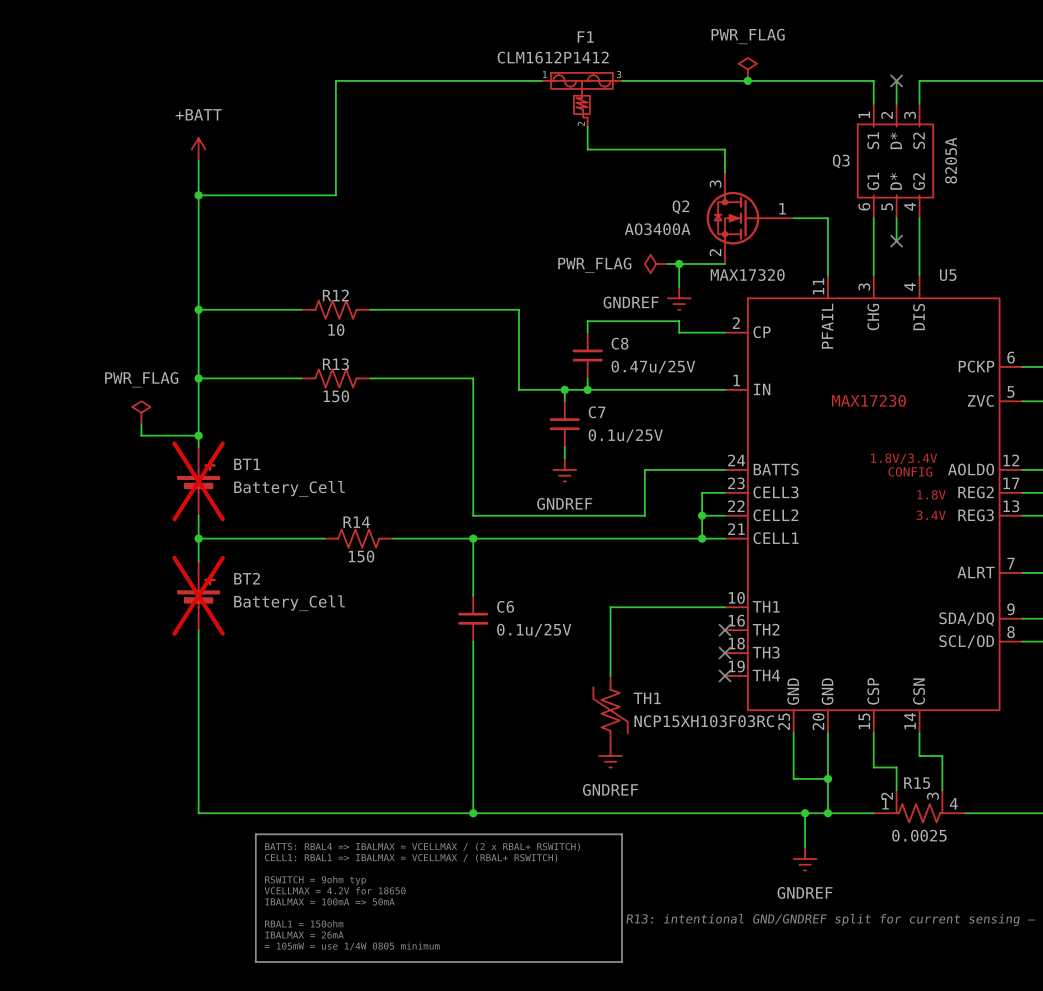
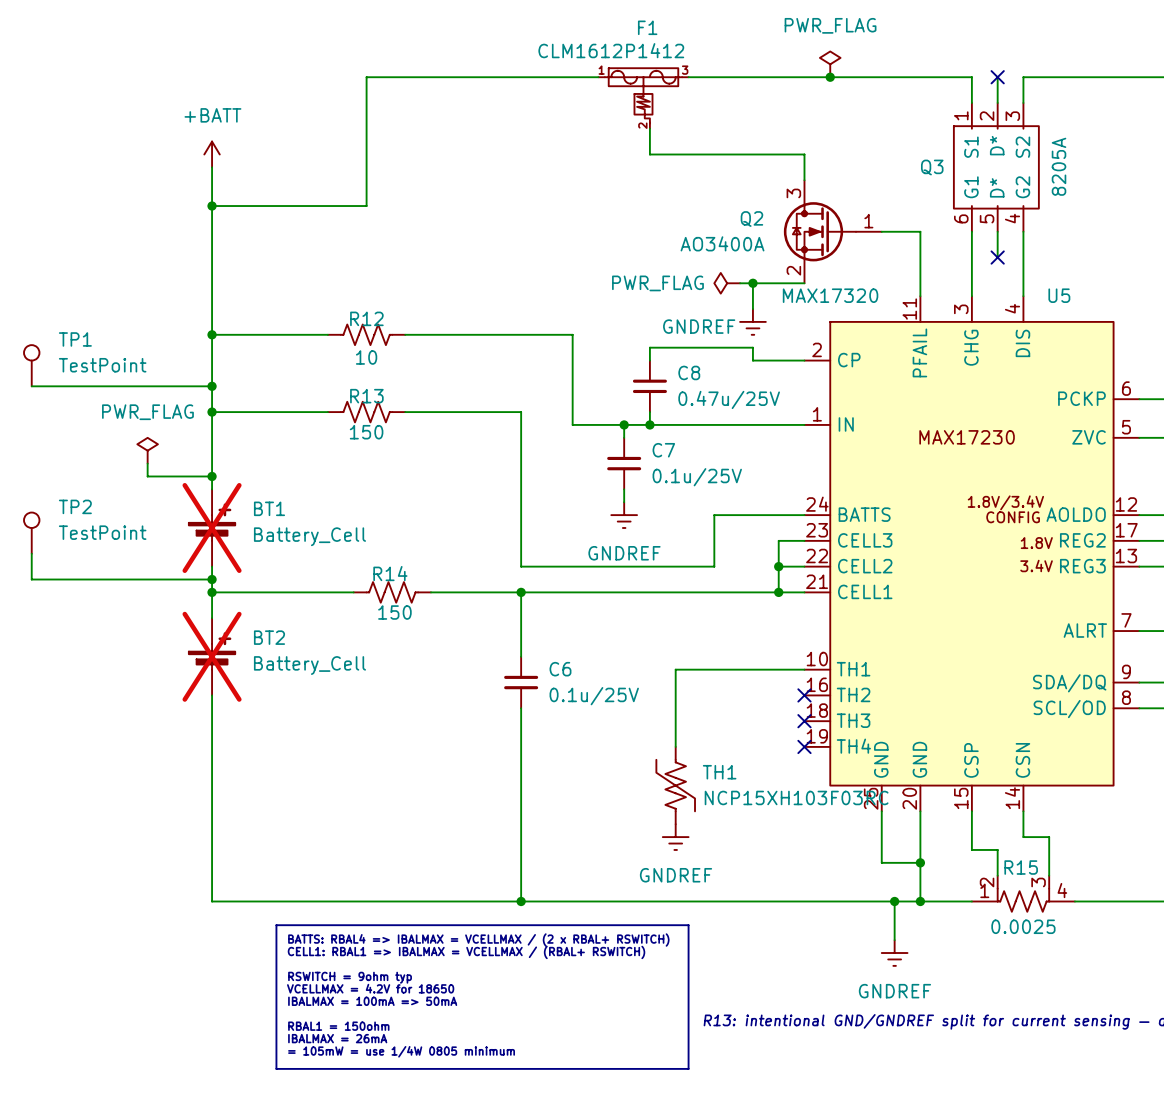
TP1: none -> TestPoint (31, 365)
wire: none -> (31, 386) (212, 386)
junction: none -> (212, 386)
TP2: none -> TestPoint (31, 533)
wire: none -> (31, 553) (31, 579) (212, 579)
junction: none -> (212, 579)

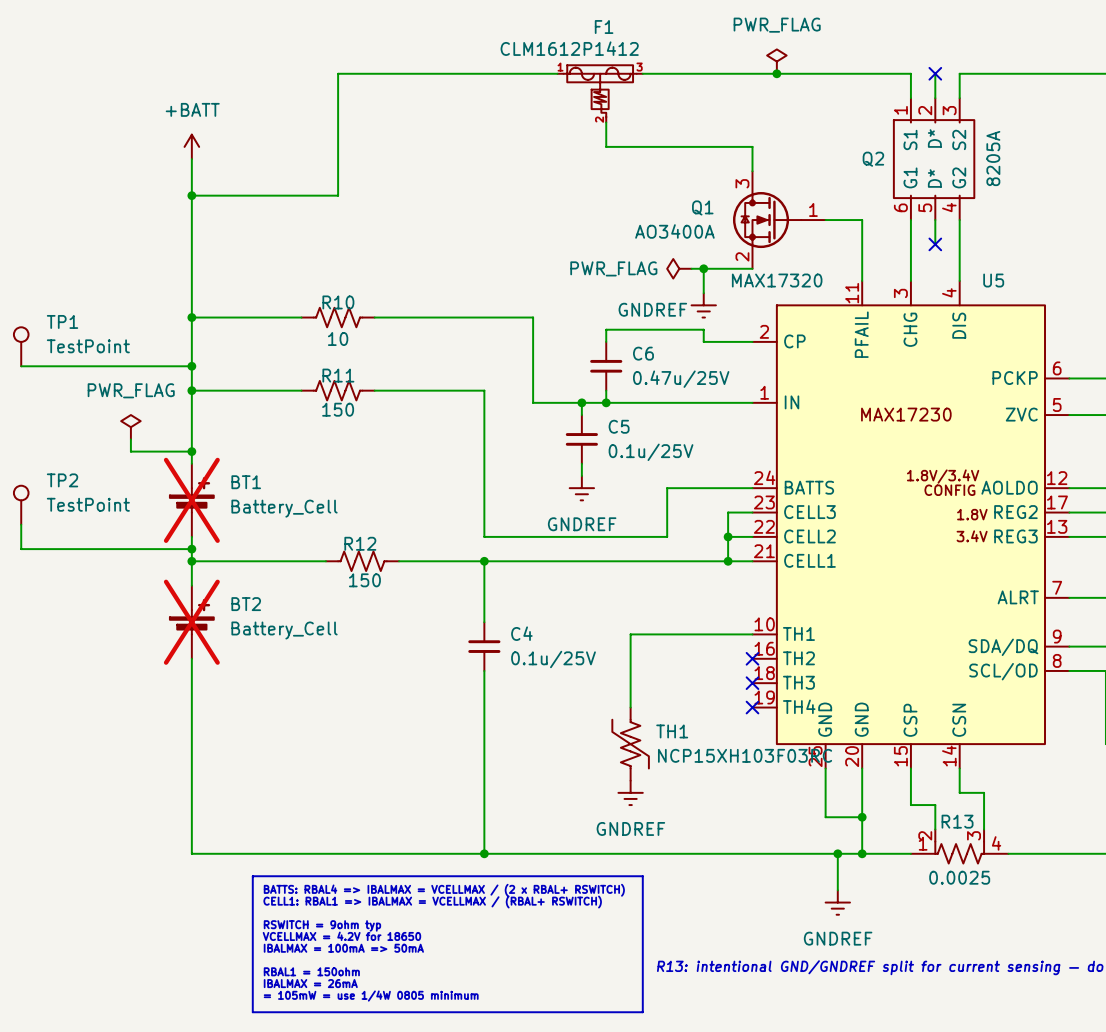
Q3 name: Q3 (932, 167) -> Q2 (873, 159)
Q2 name: Q2 (751, 219) -> Q1 (702, 207)
R12 name: R12 (366, 318) -> R10 (338, 302)
C8 name: C8 (689, 372) -> C6 (643, 353)
R13 name: R13 (366, 396) -> R11 (338, 375)
C7 name: C7 (663, 450) -> C5 (619, 426)
R14 name: R14 (390, 573) -> R12 (360, 543)
C6 name: C6 (560, 669) -> C4 (521, 633)
R15 name: R15 (1021, 867) -> R13 (957, 821)

